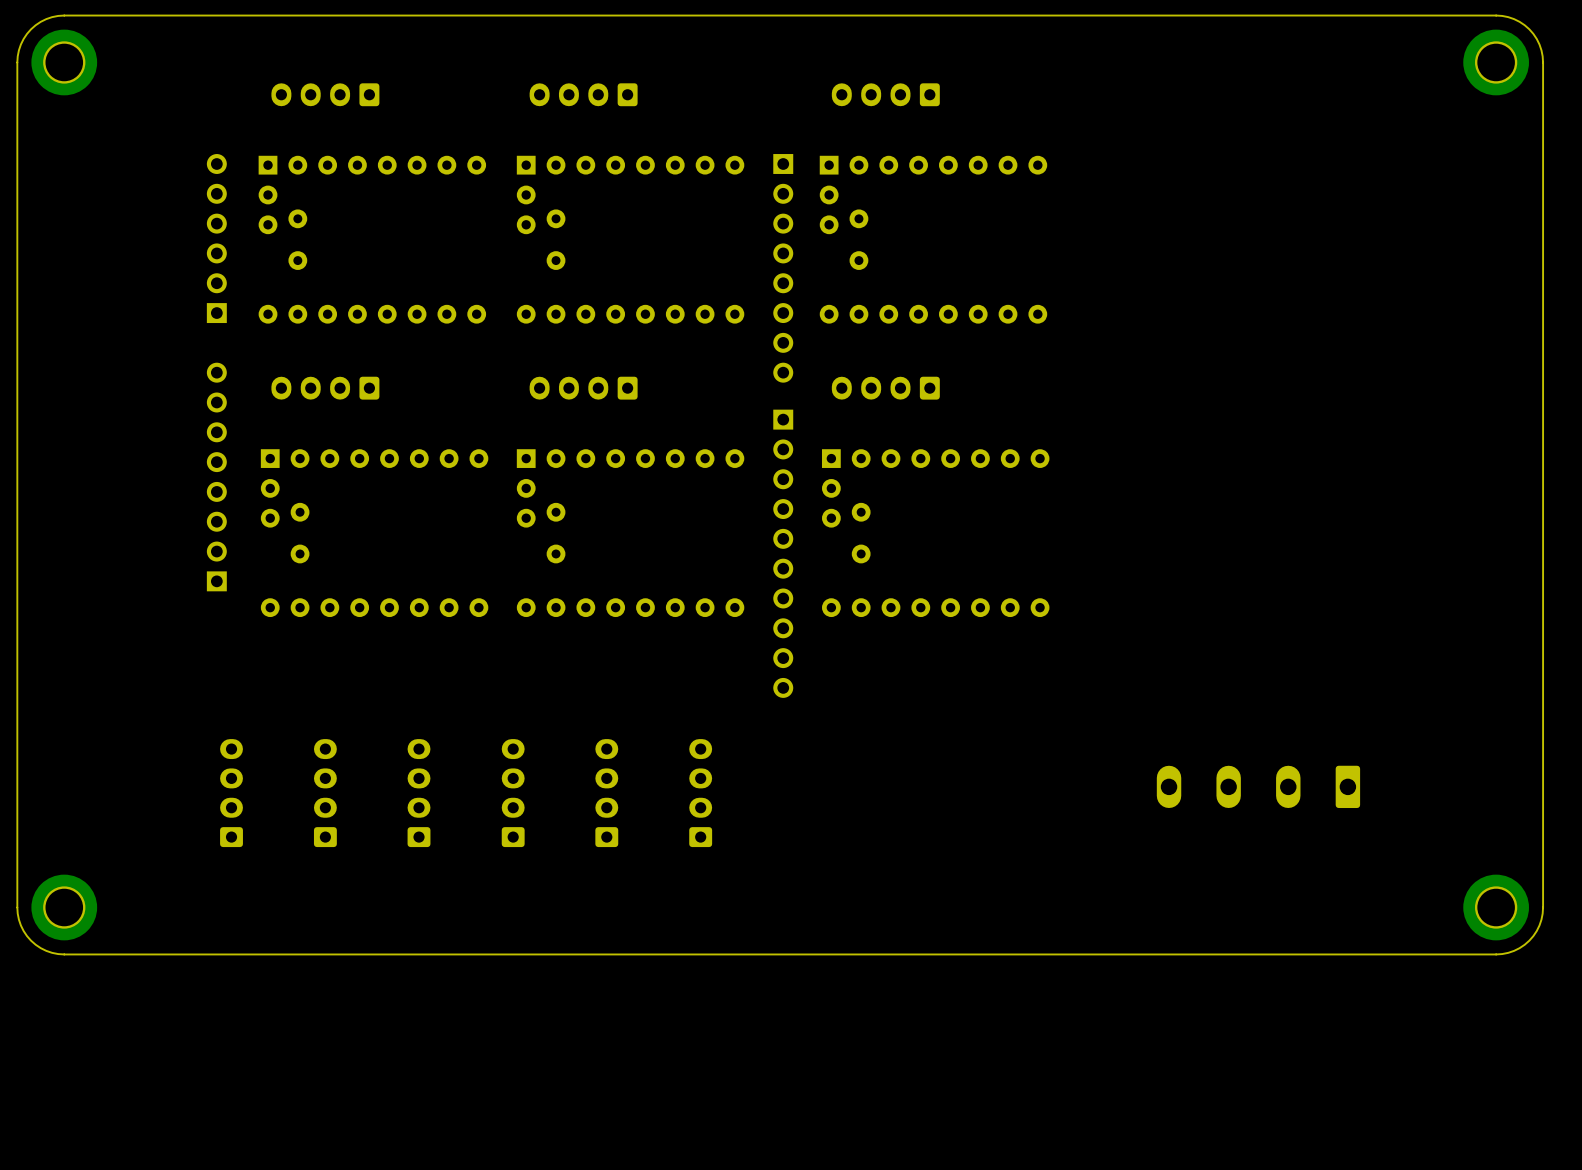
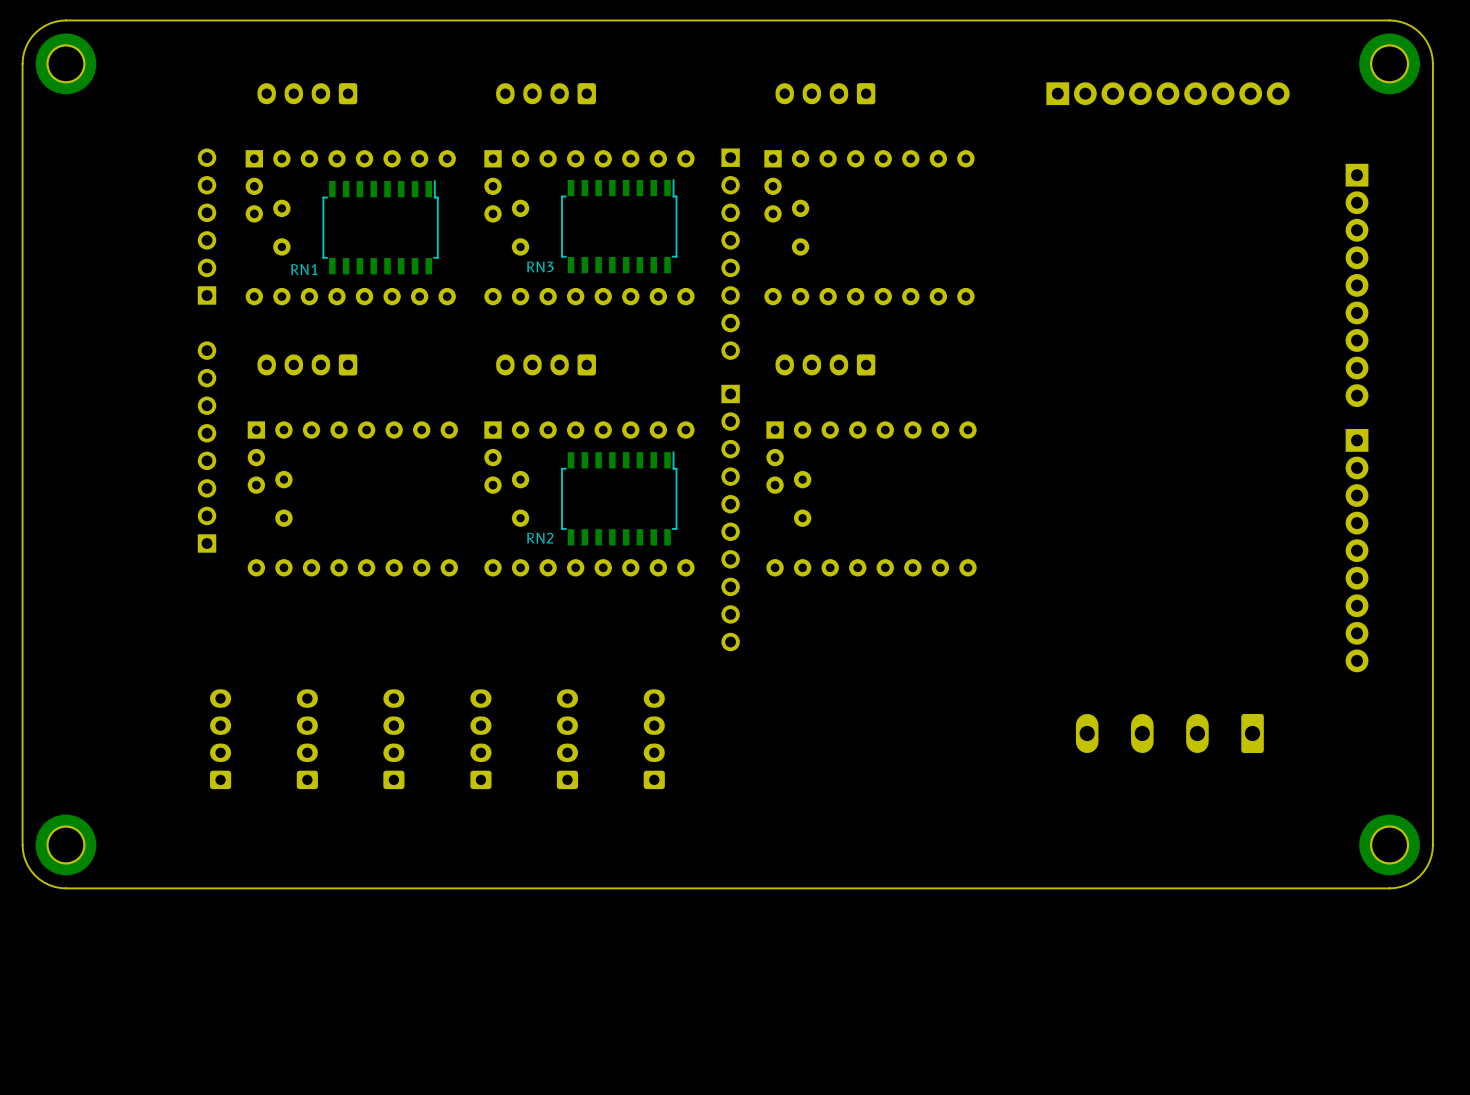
part: none -> (1168, 93)
RN3: none -> (619, 226)
RN1: none -> (380, 227)
part: none -> (1357, 285)
RN2: none -> (619, 498)
part: none -> (1357, 550)

